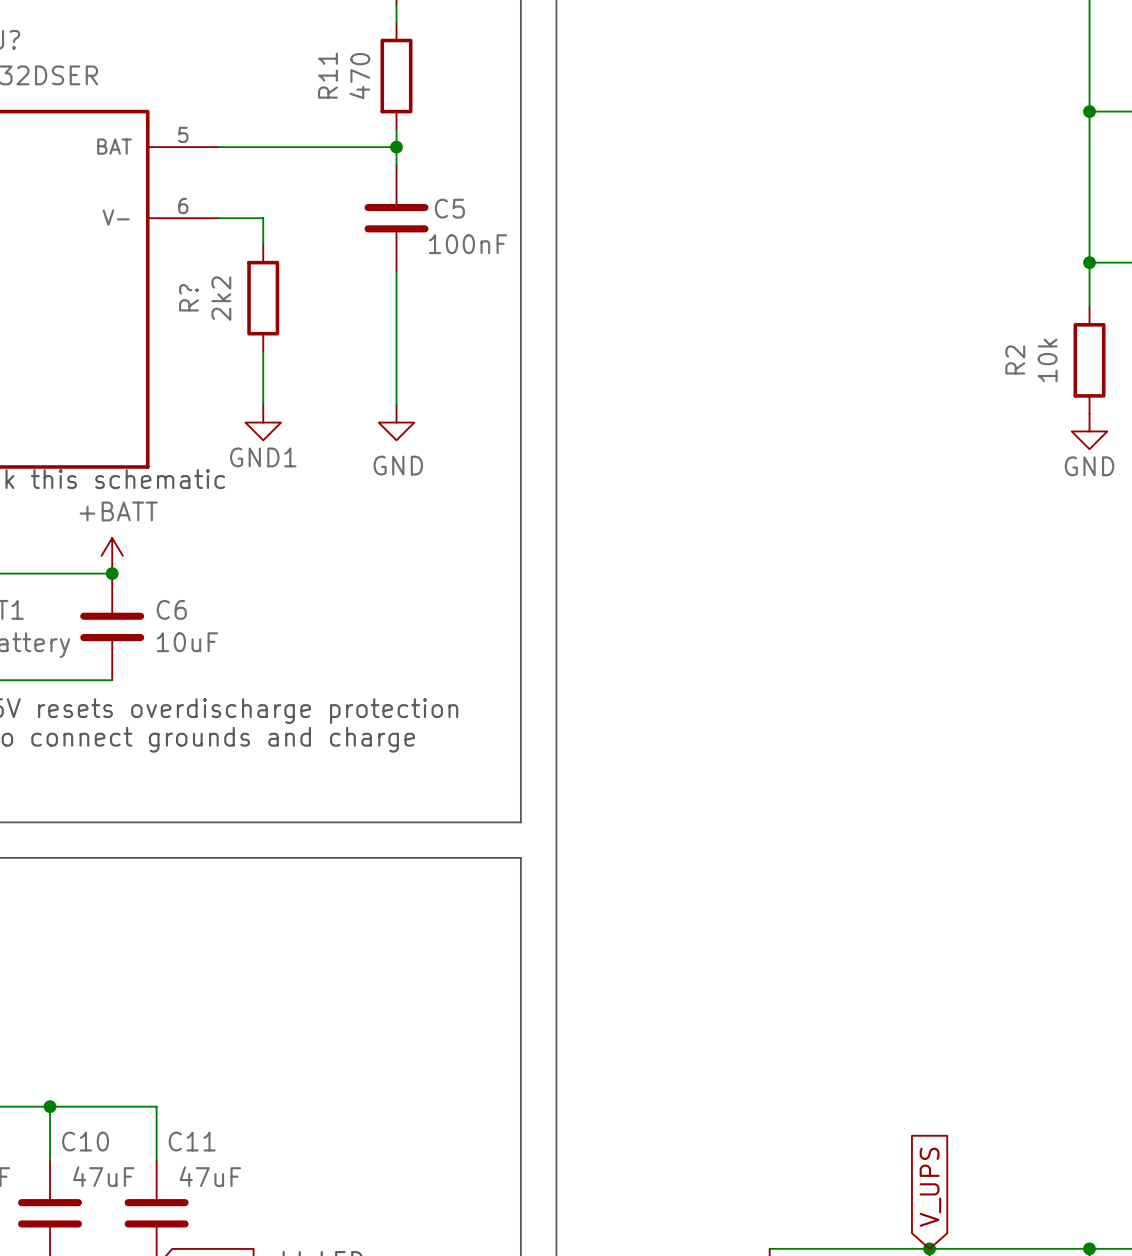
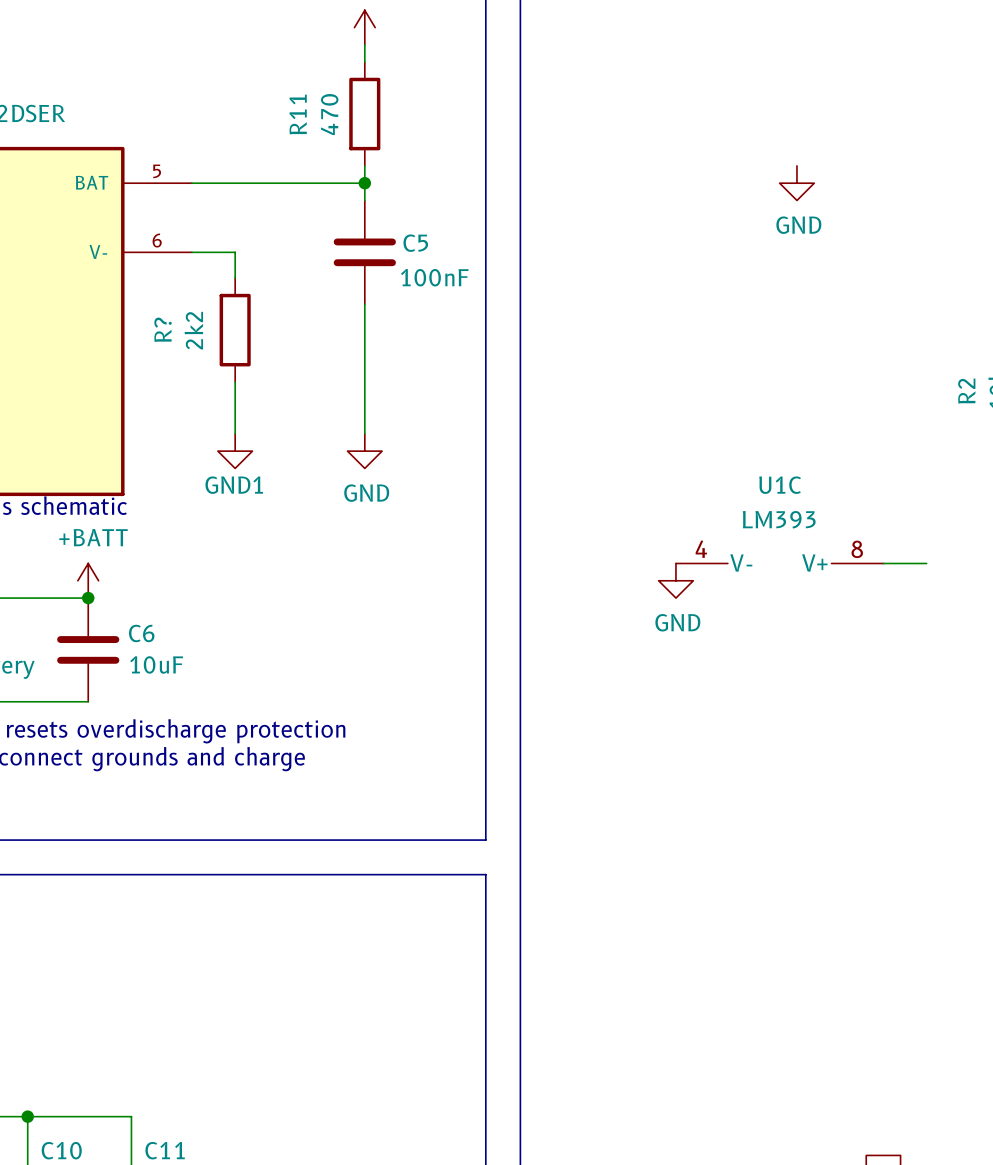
power symbol: none -> GND (796, 183)
U1C: none -> LM393 (779, 563)
wire: none -> (883, 563) (926, 563)
power symbol: none -> GND (675, 580)

